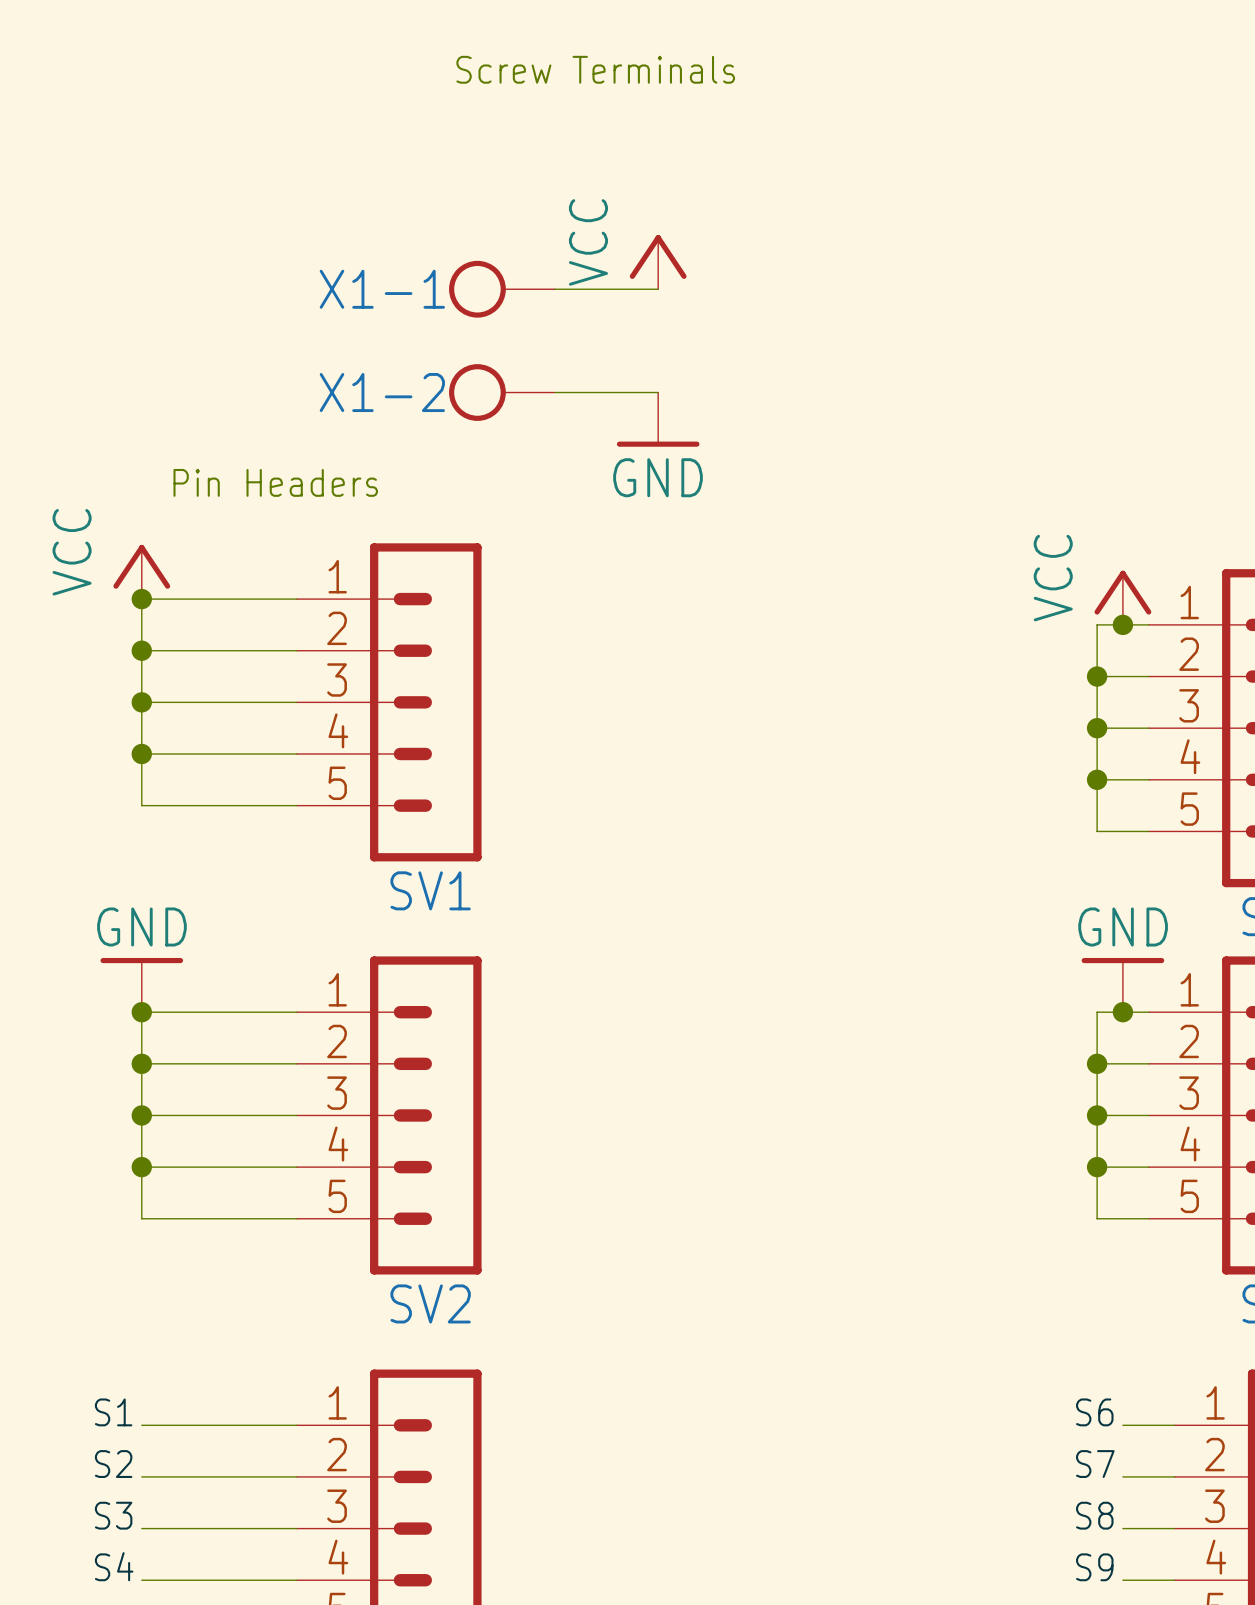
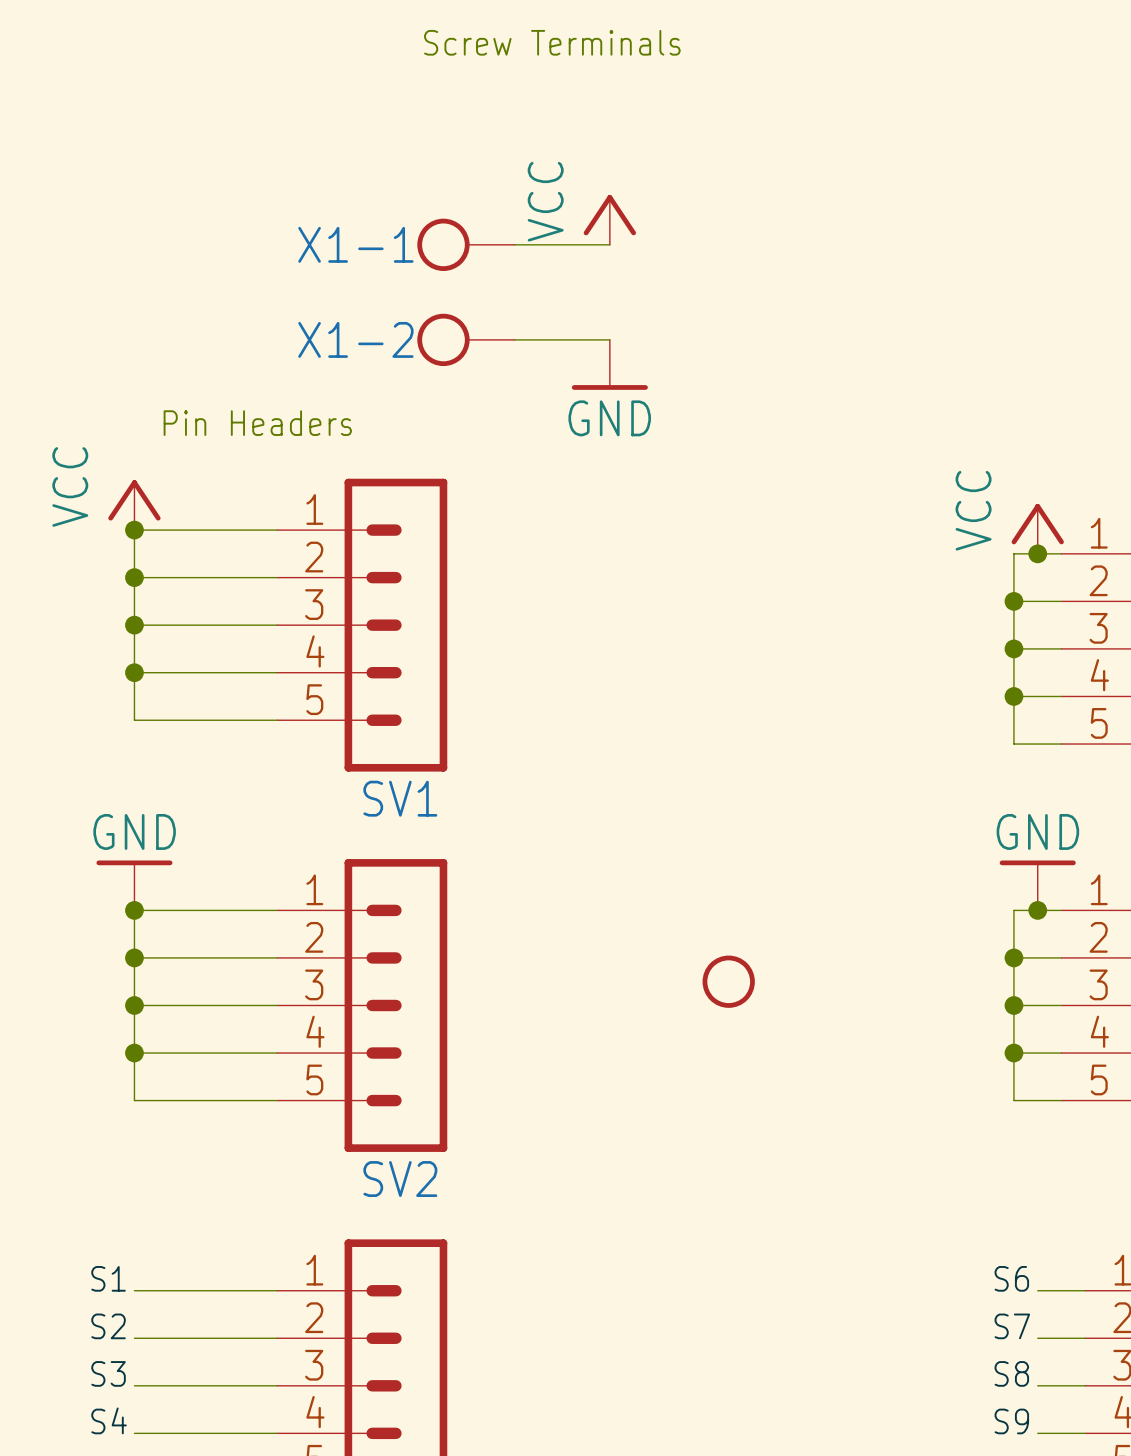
part: none -> (728, 981)

